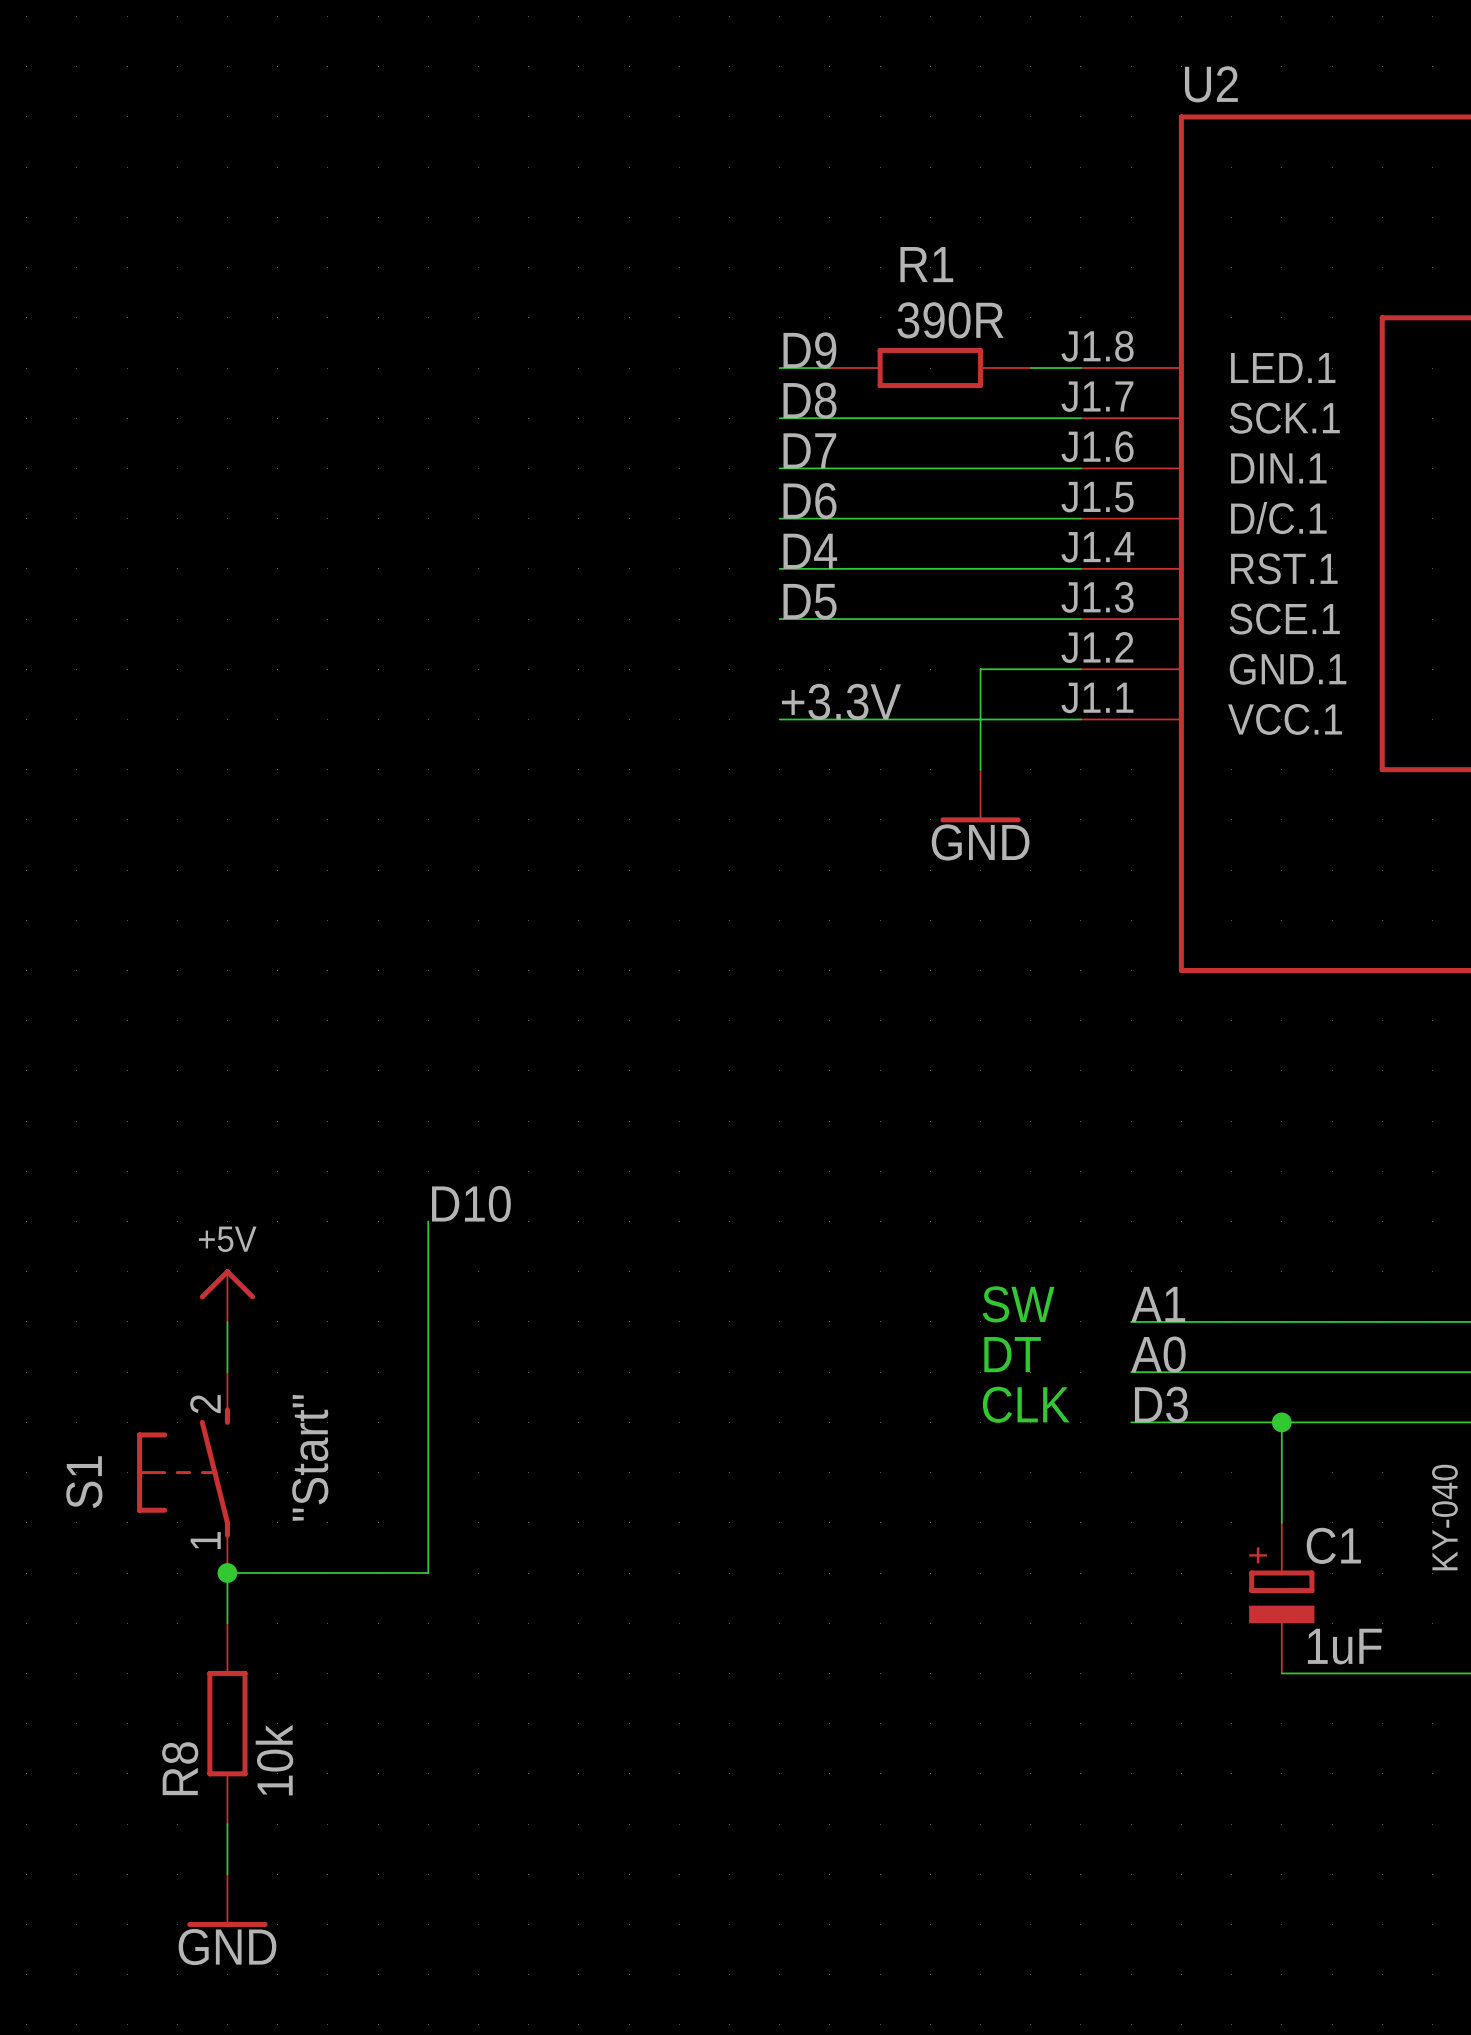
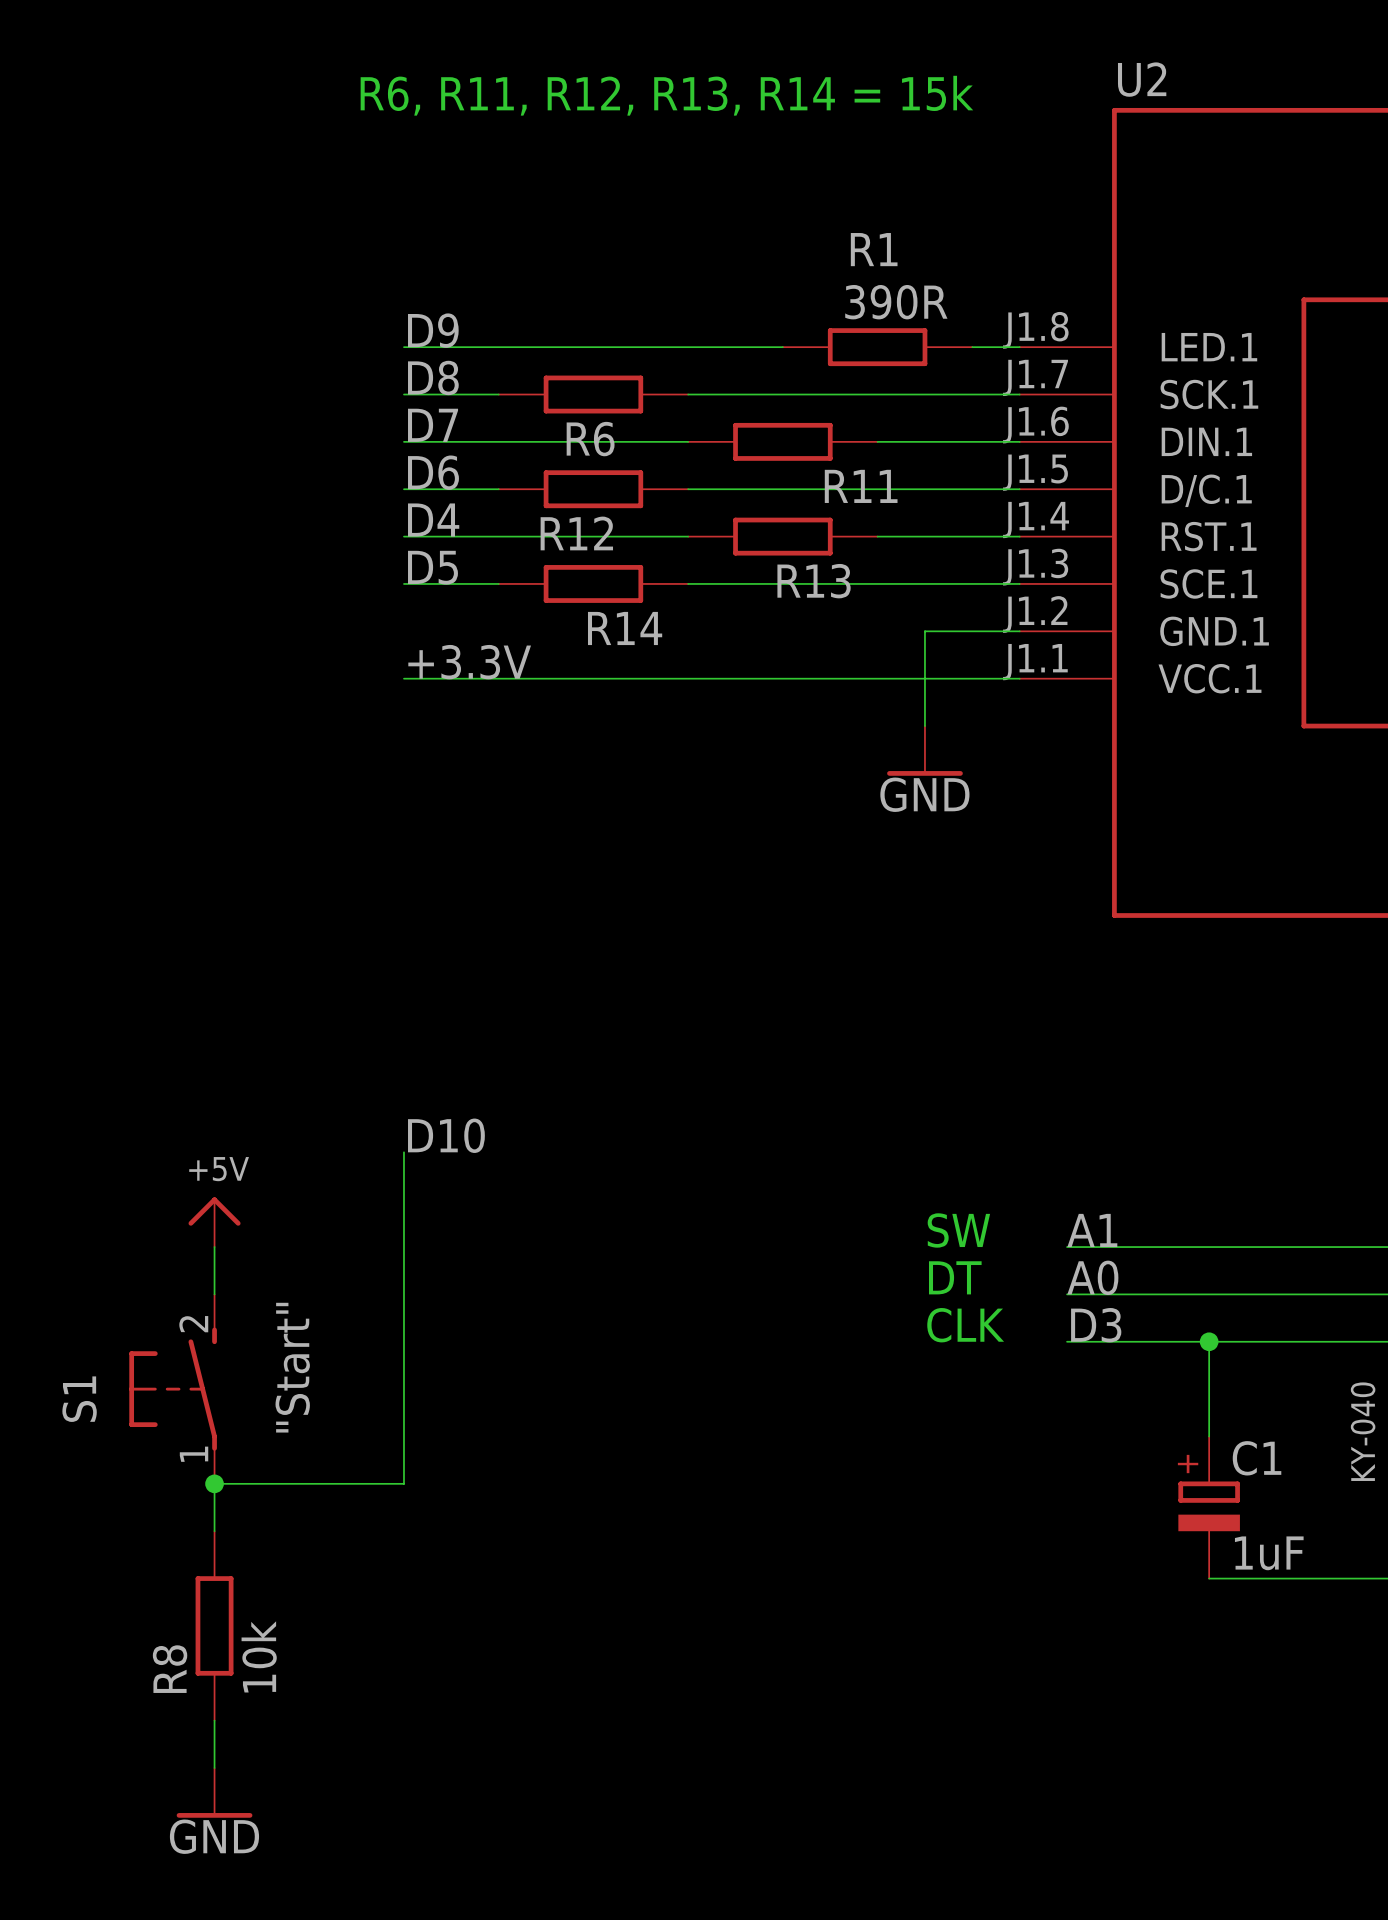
text: none -> R6, R11, R12, R13, R14 = 15k (666, 95)
label position: D9 (809, 350) -> D9 (433, 330)
wire: none -> (403, 347) (735, 347)
label position: D8 (809, 400) -> D8 (433, 377)
wire: none -> (403, 394) (498, 394)
R6: none -> (593, 394)
wire: none -> (688, 394) (735, 394)
label position: D7 (809, 450) -> D7 (433, 425)
wire: none -> (403, 441) (688, 441)
wire: (779, 468) (930, 468) -> none
R11: none -> (782, 441)
label position: D6 (809, 501) -> D6 (433, 472)
wire: none -> (403, 489) (498, 489)
R12: none -> (593, 489)
wire: none -> (688, 489) (735, 489)
label position: D4 (810, 551) -> D4 (433, 520)
wire: none -> (403, 536) (688, 536)
wire: (779, 568) (930, 568) -> none
R13: none -> (782, 536)
label position: D5 (810, 601) -> D5 (432, 567)
wire: none -> (403, 583) (498, 583)
R14: none -> (593, 583)
wire: none -> (688, 583) (735, 583)
label position: +3.3V (841, 701) -> +3.3V (469, 662)
wire: none -> (403, 678) (735, 678)

